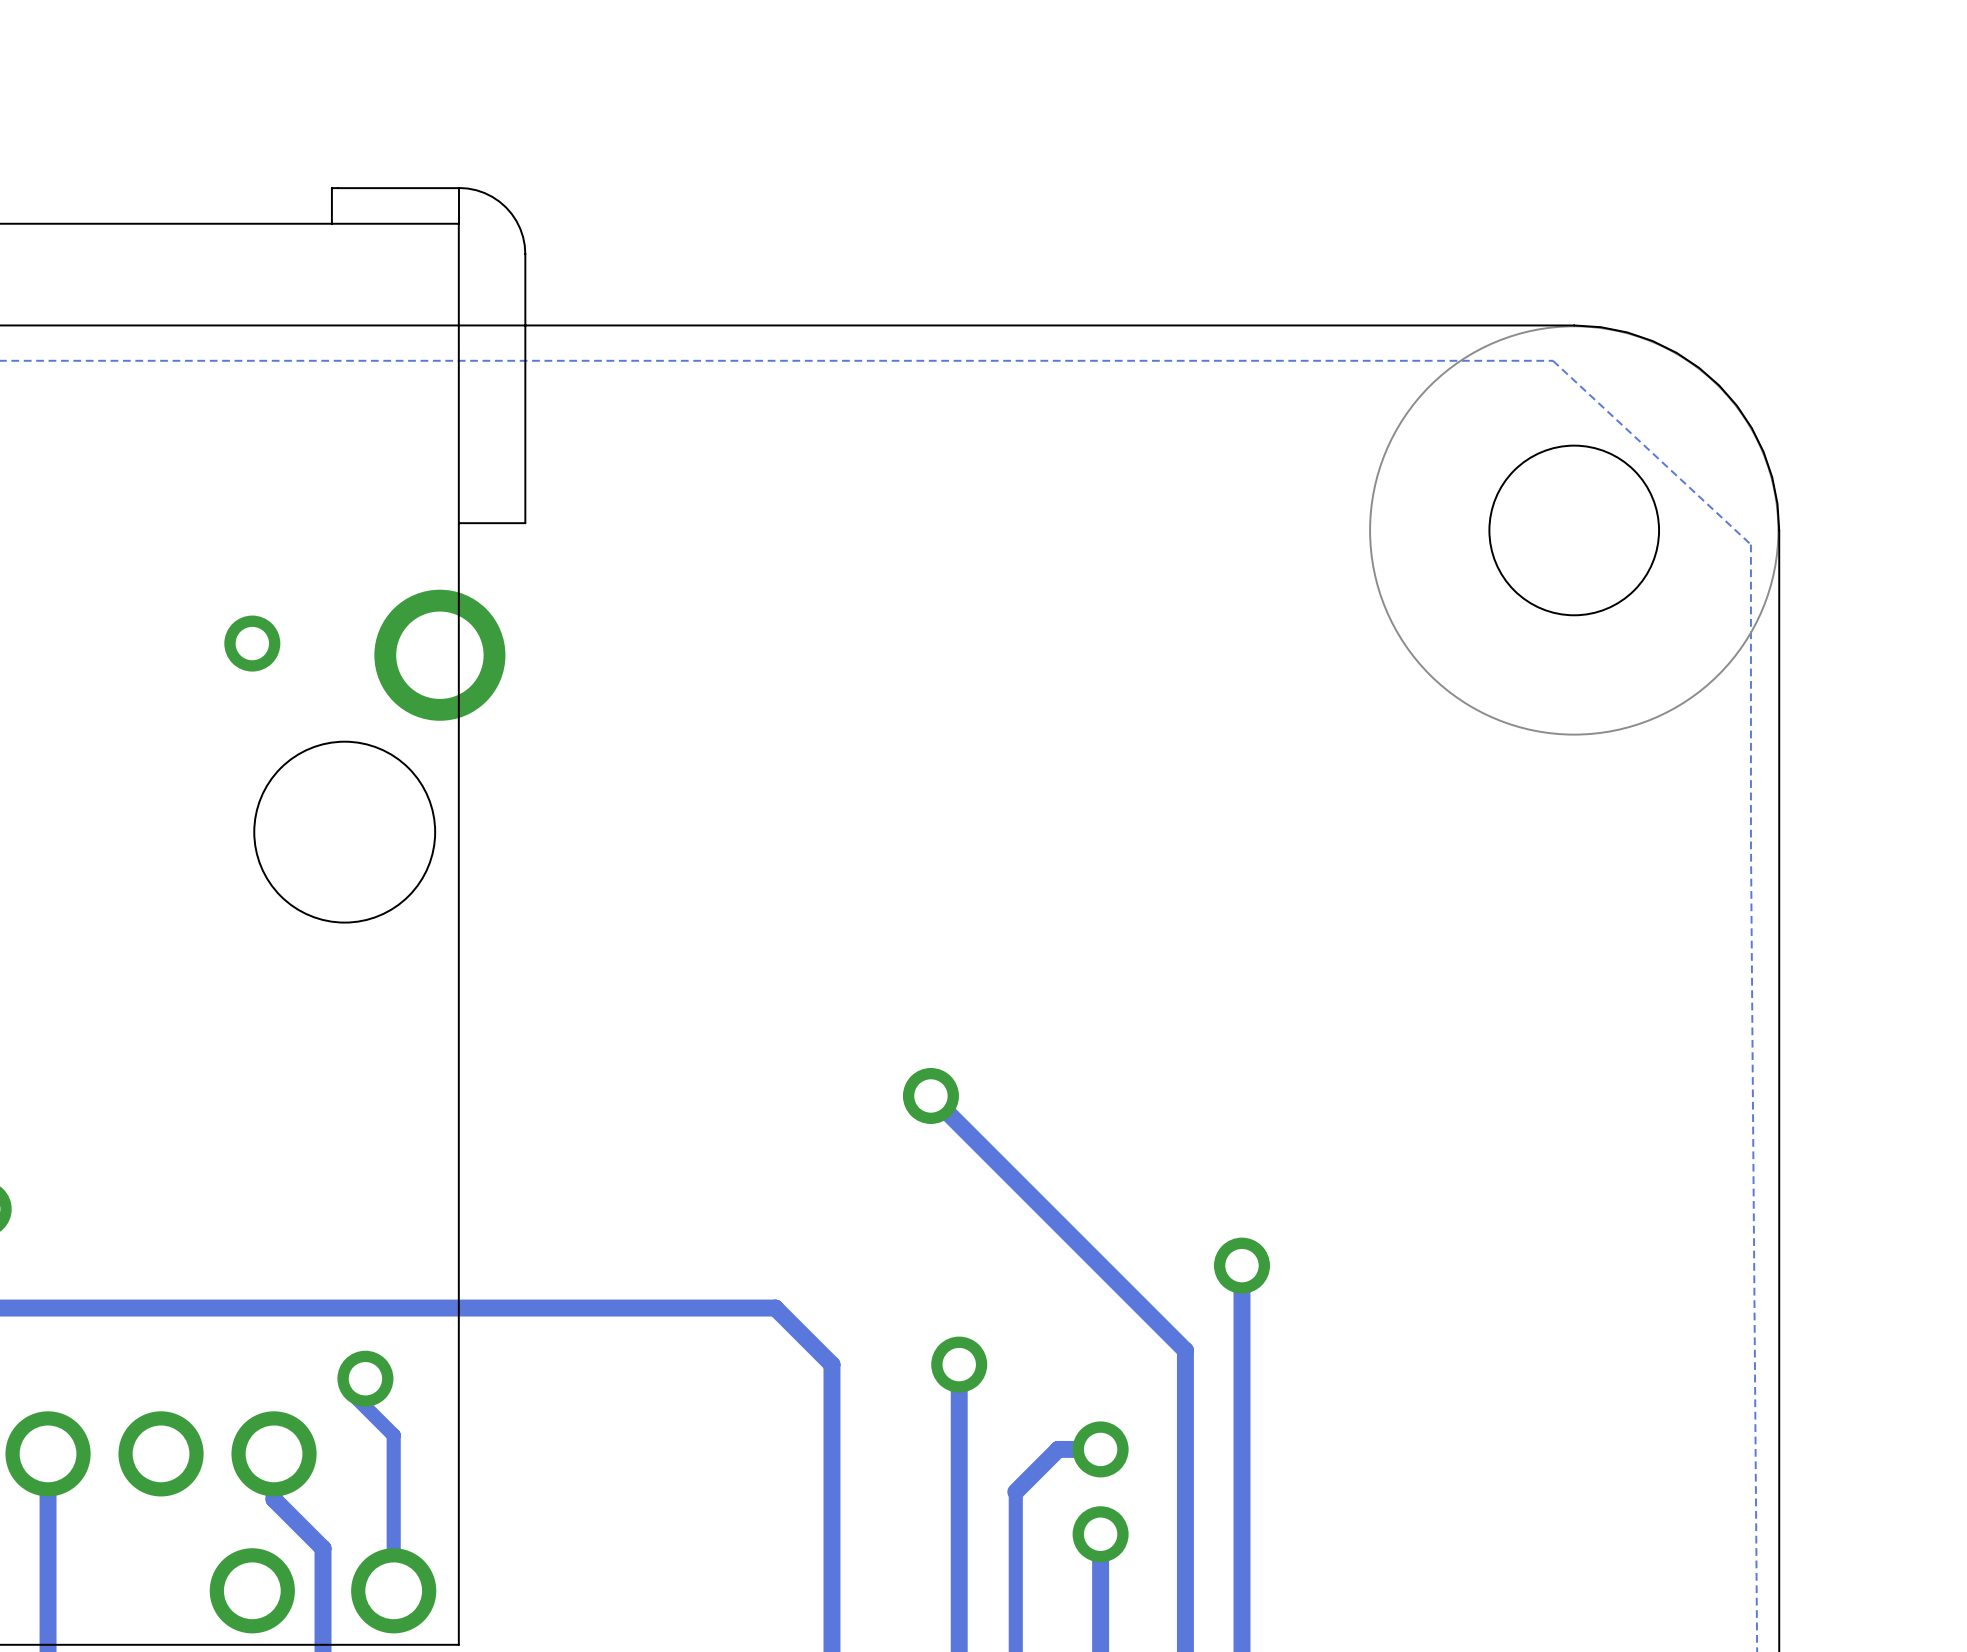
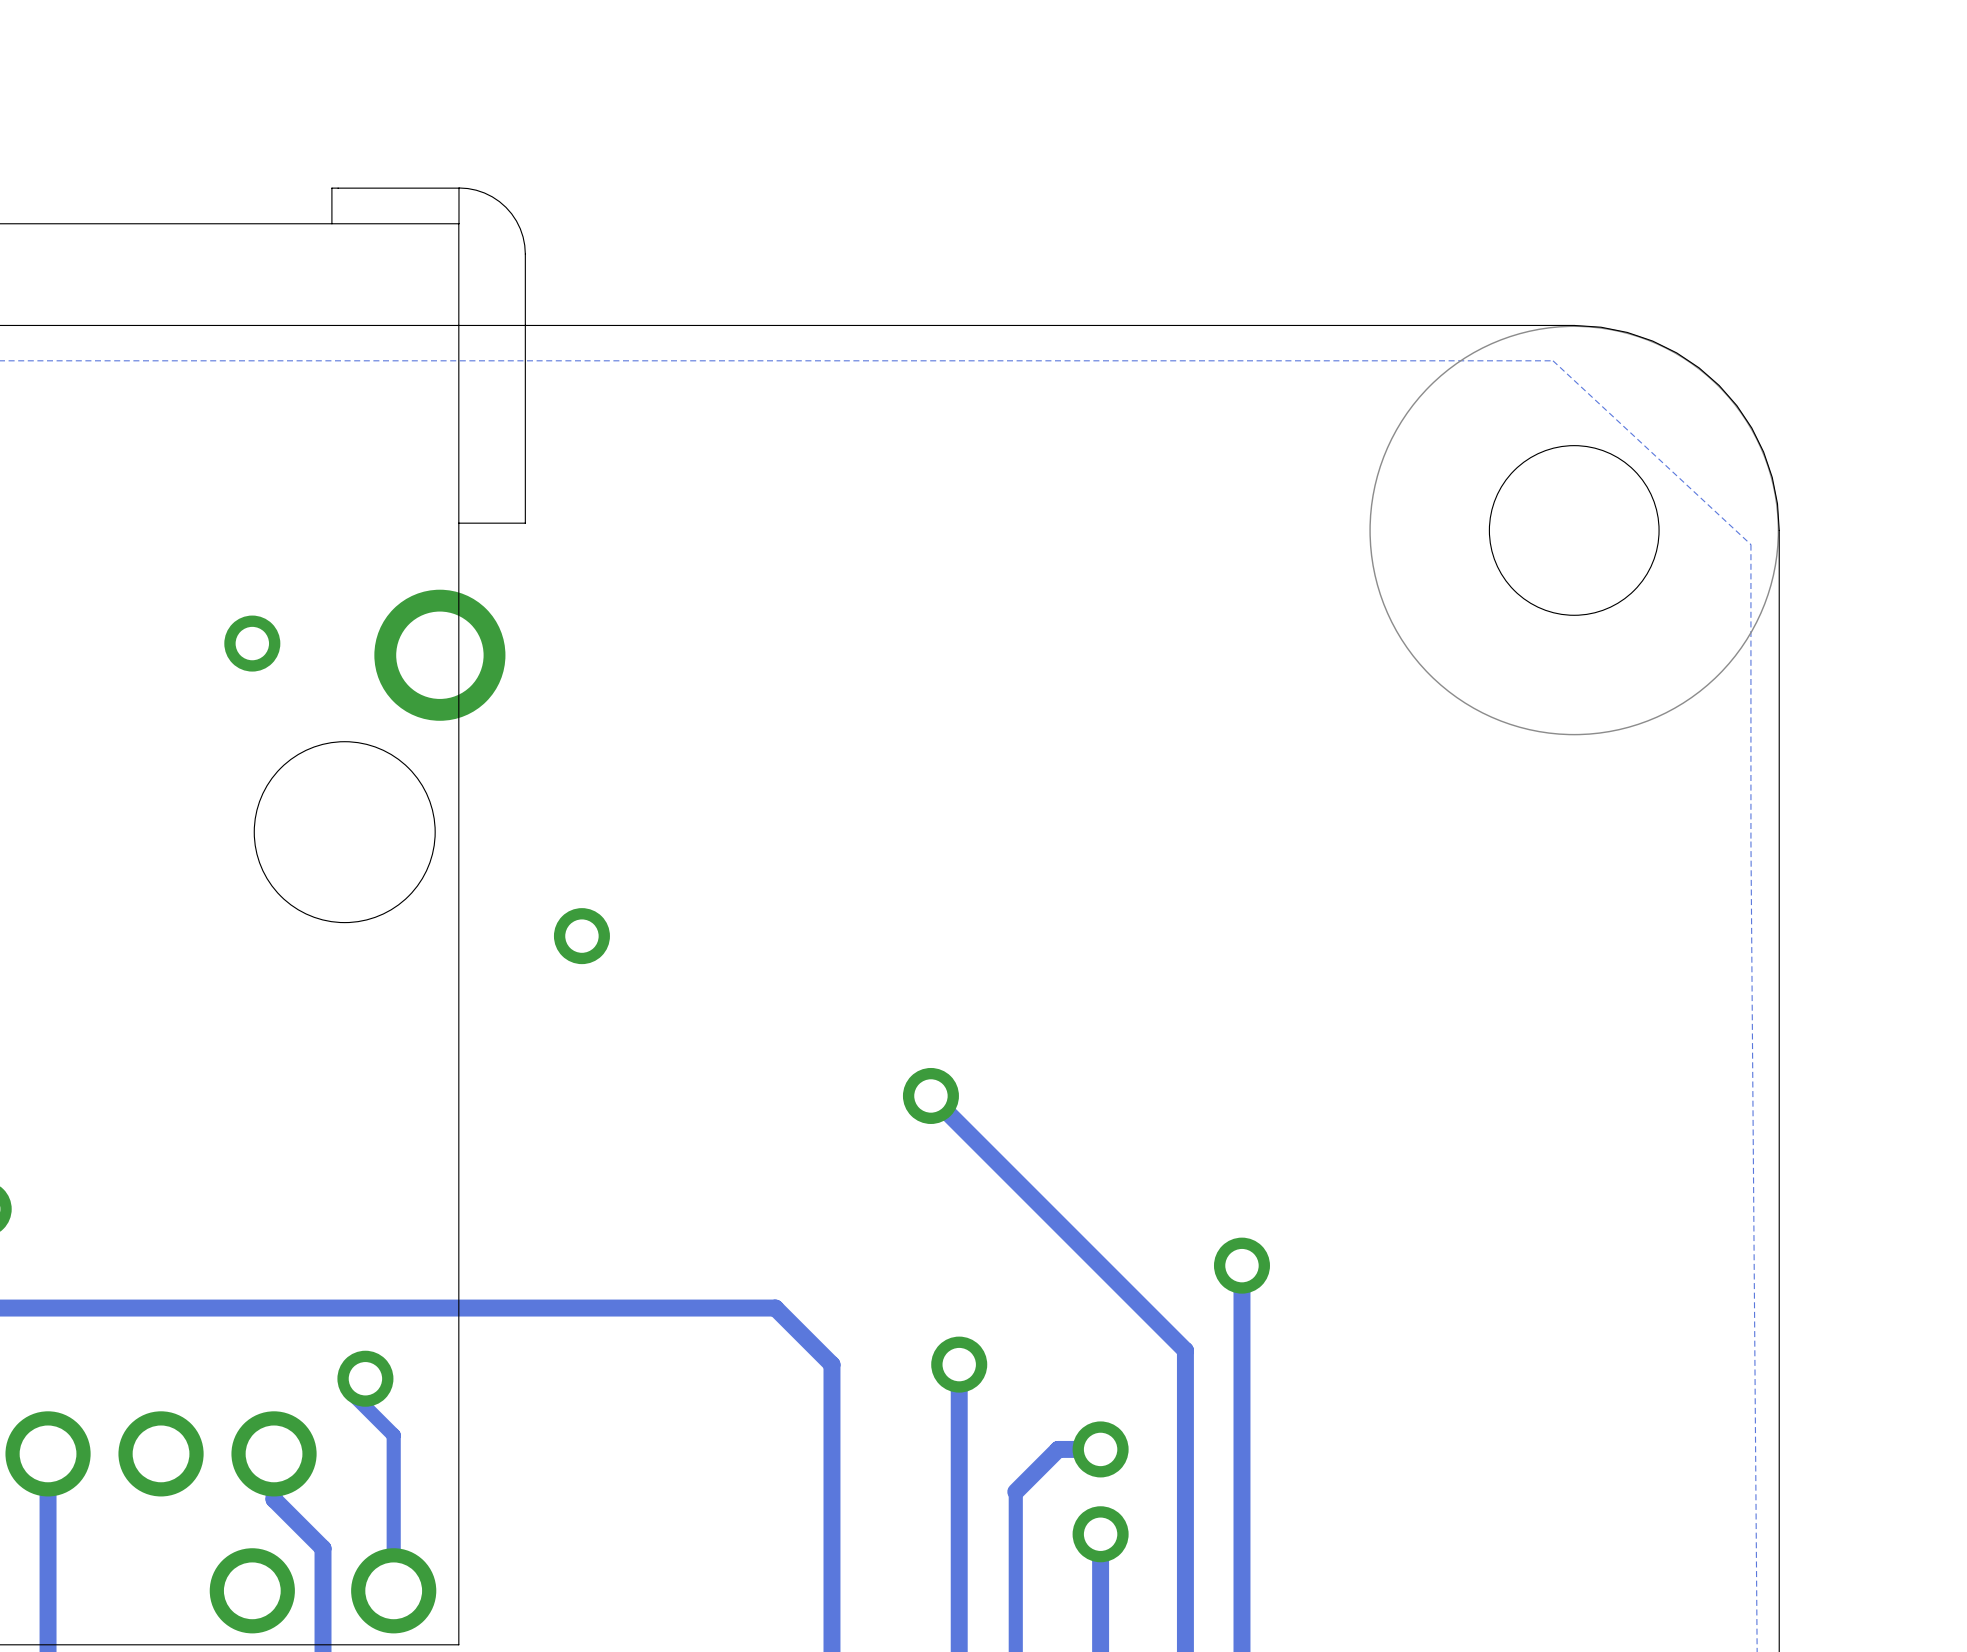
via: none -> (581, 936)

